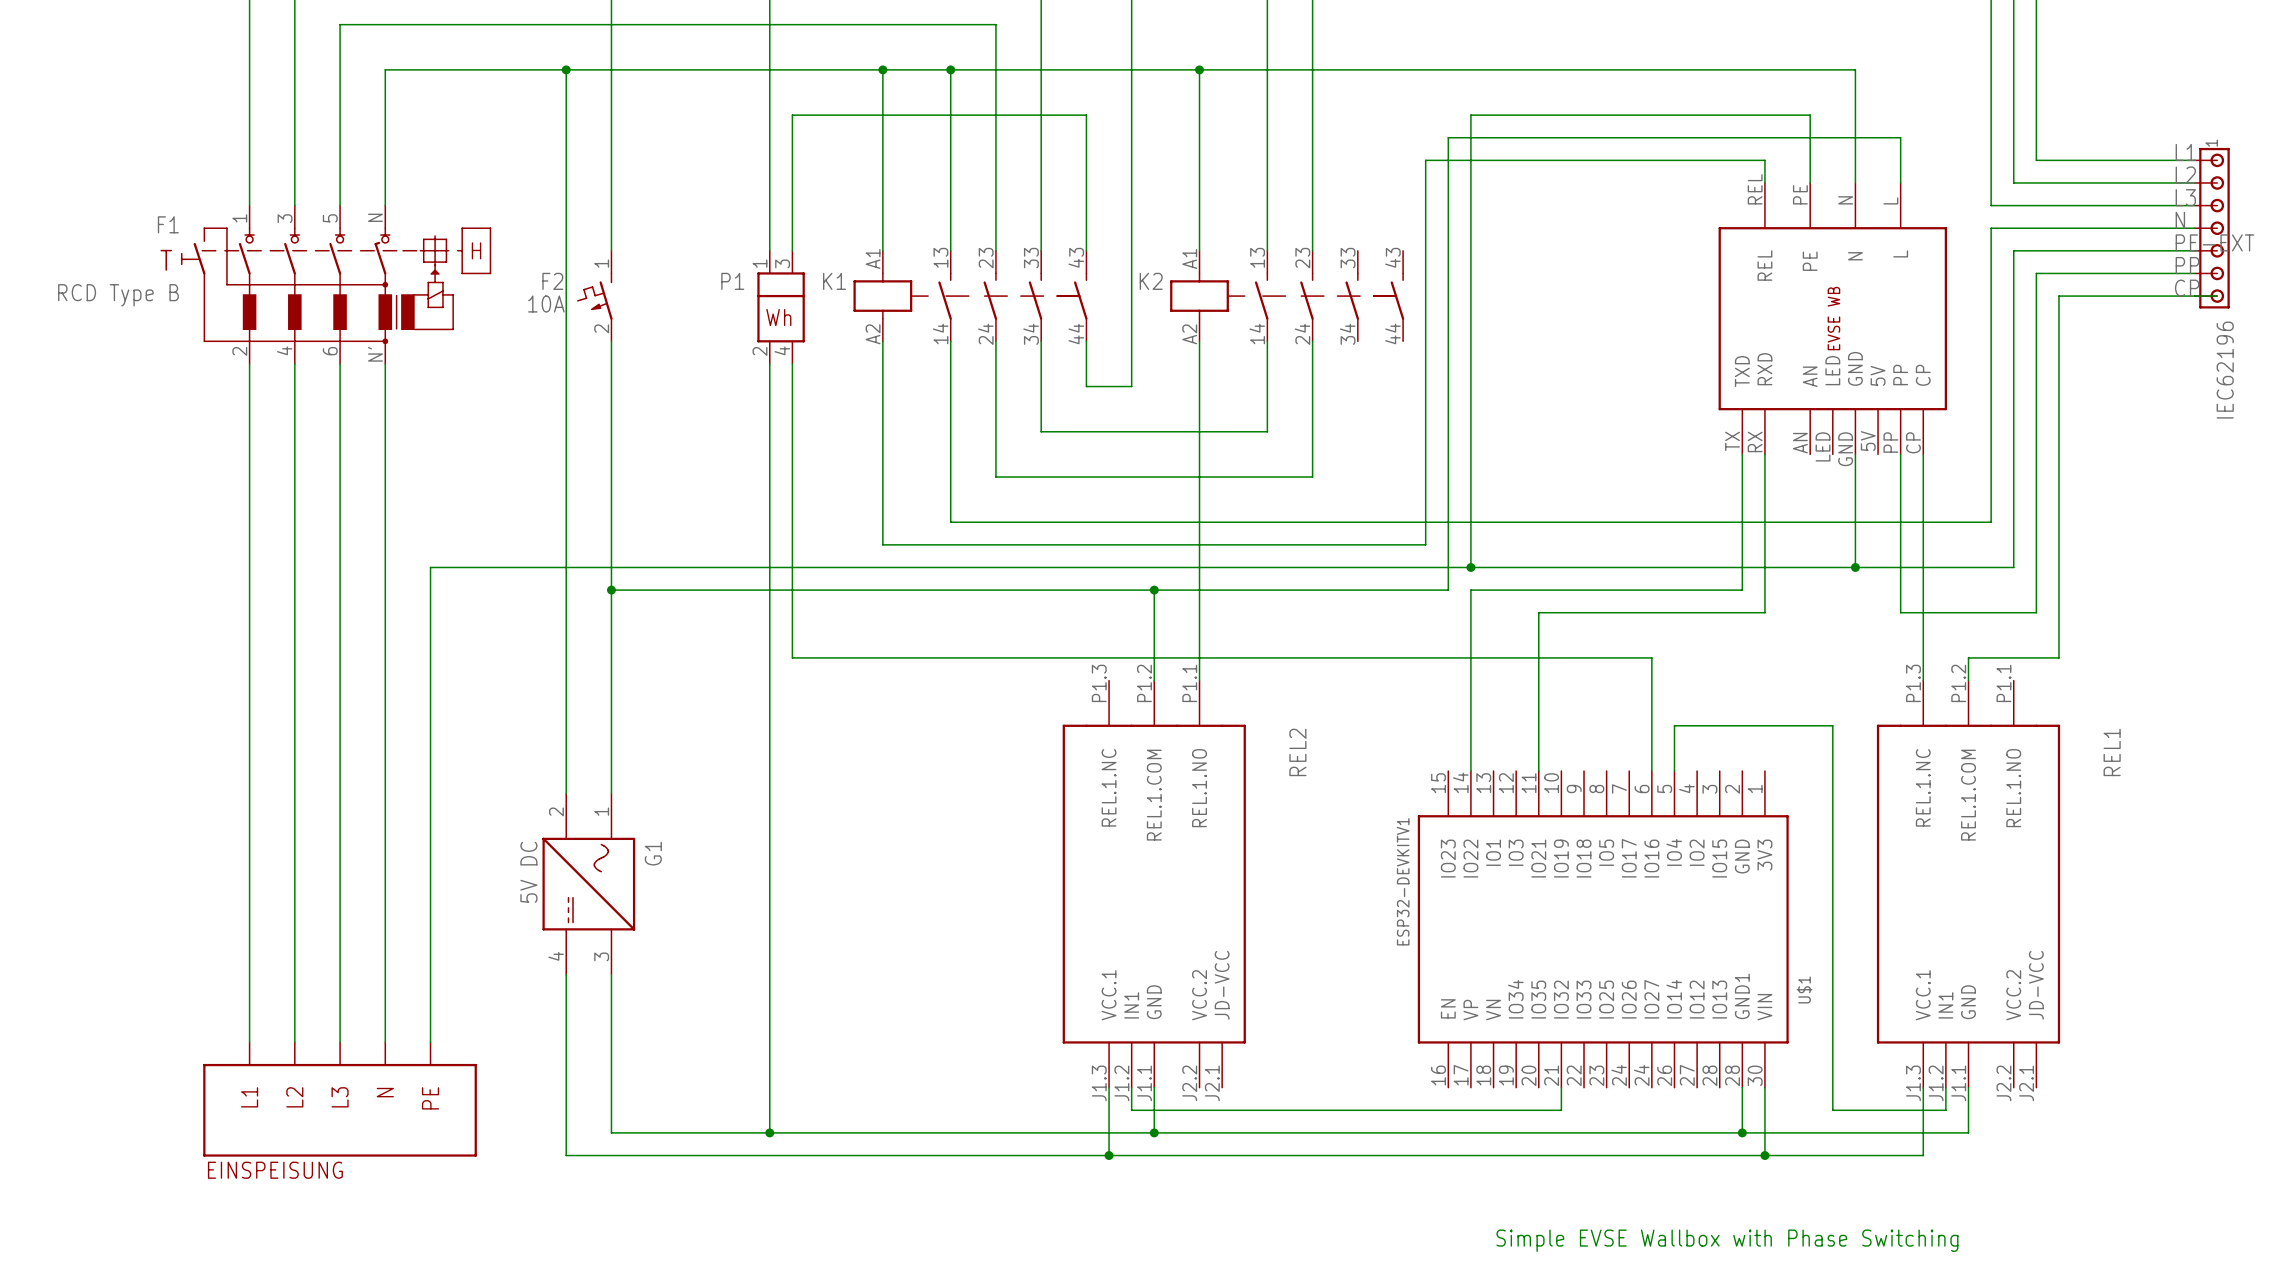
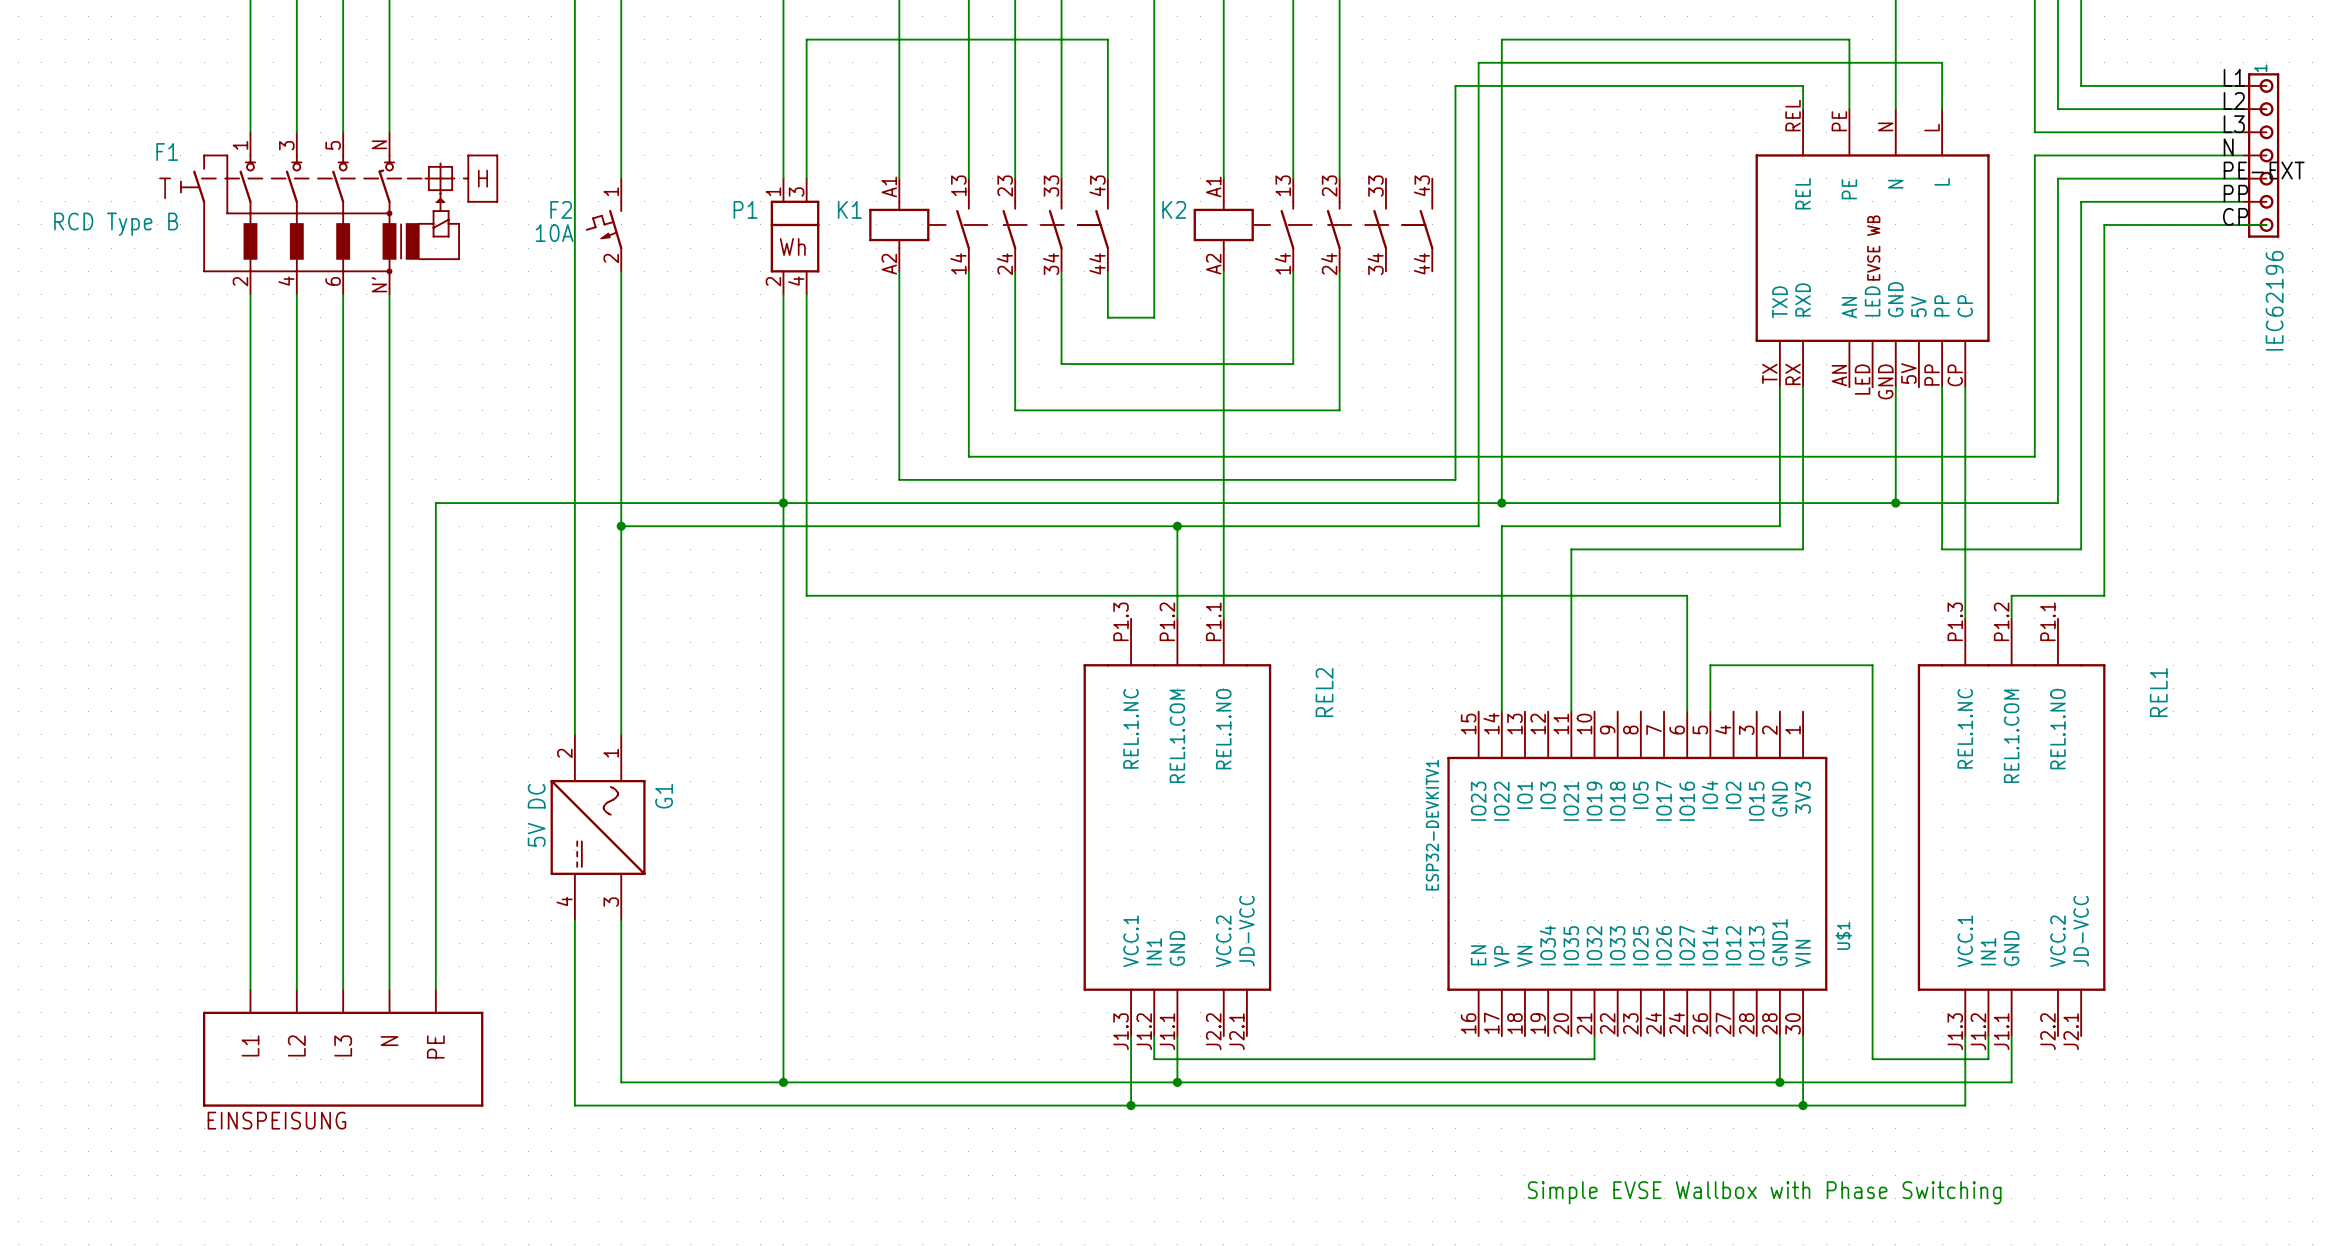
junction: none -> (783, 503)

